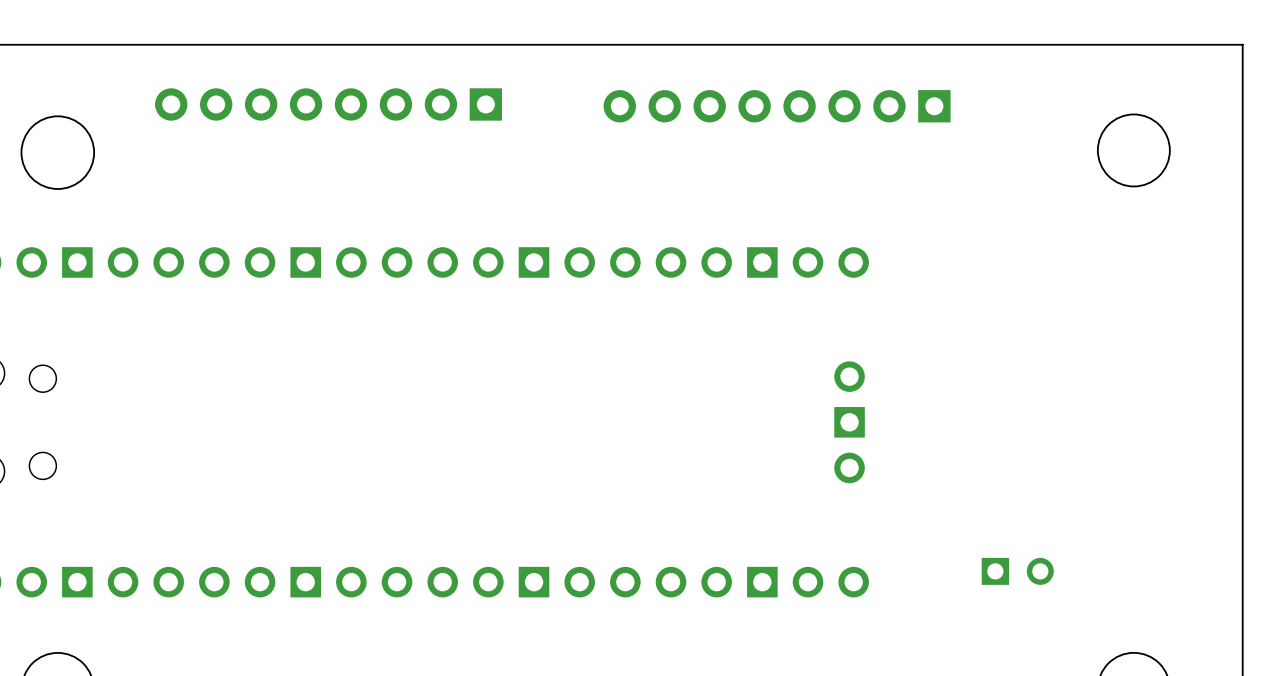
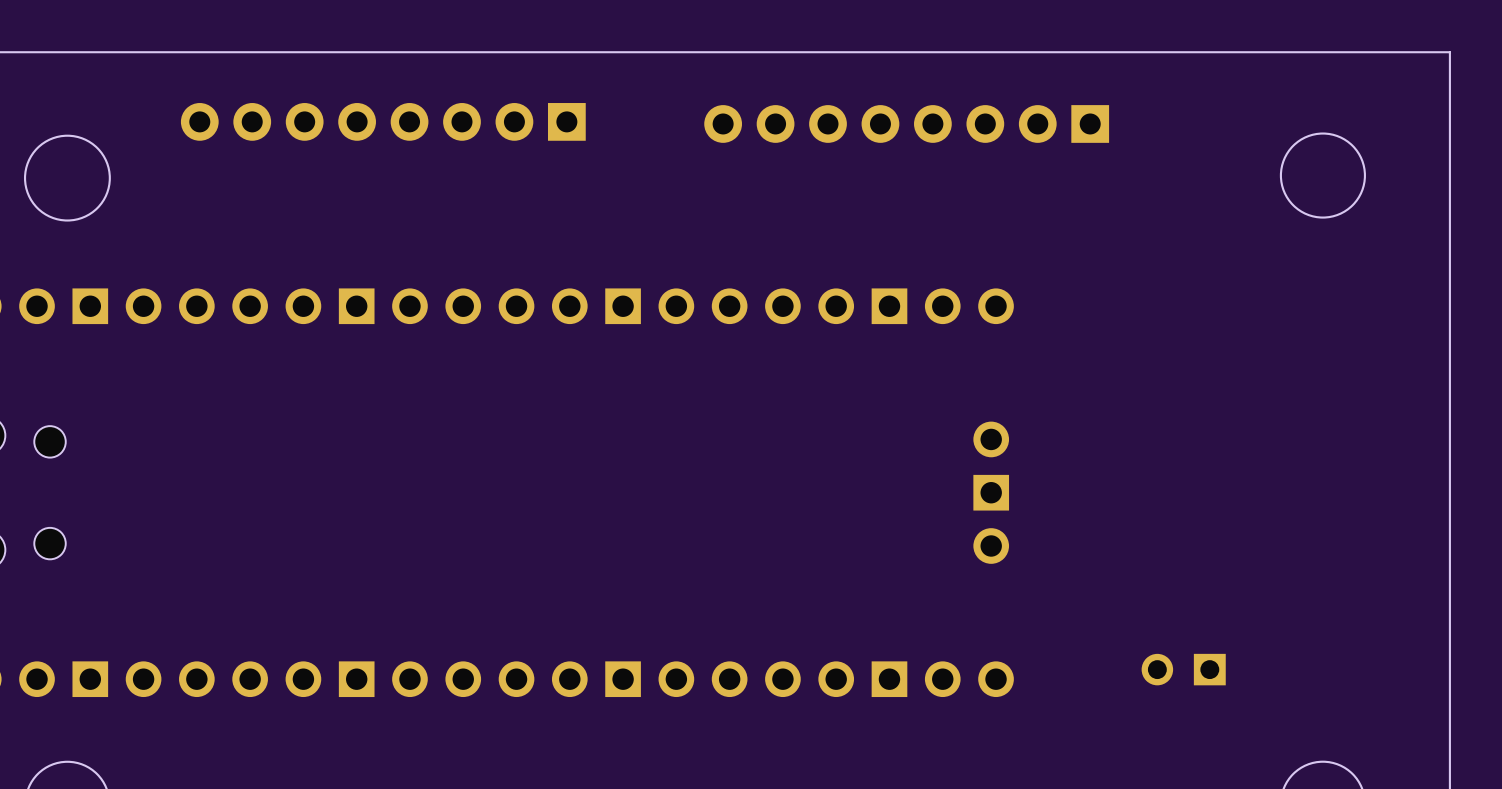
part rotation: 0° (1017, 571) -> 180° (1183, 669)

